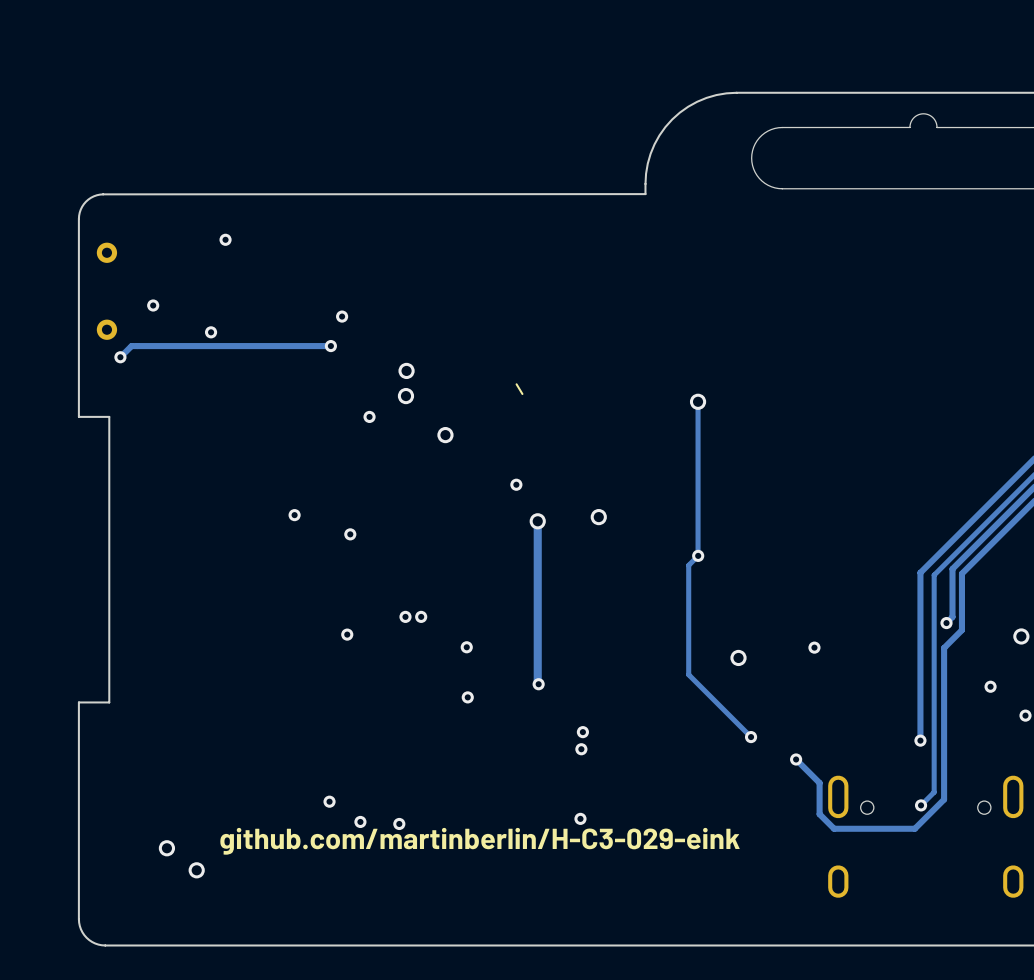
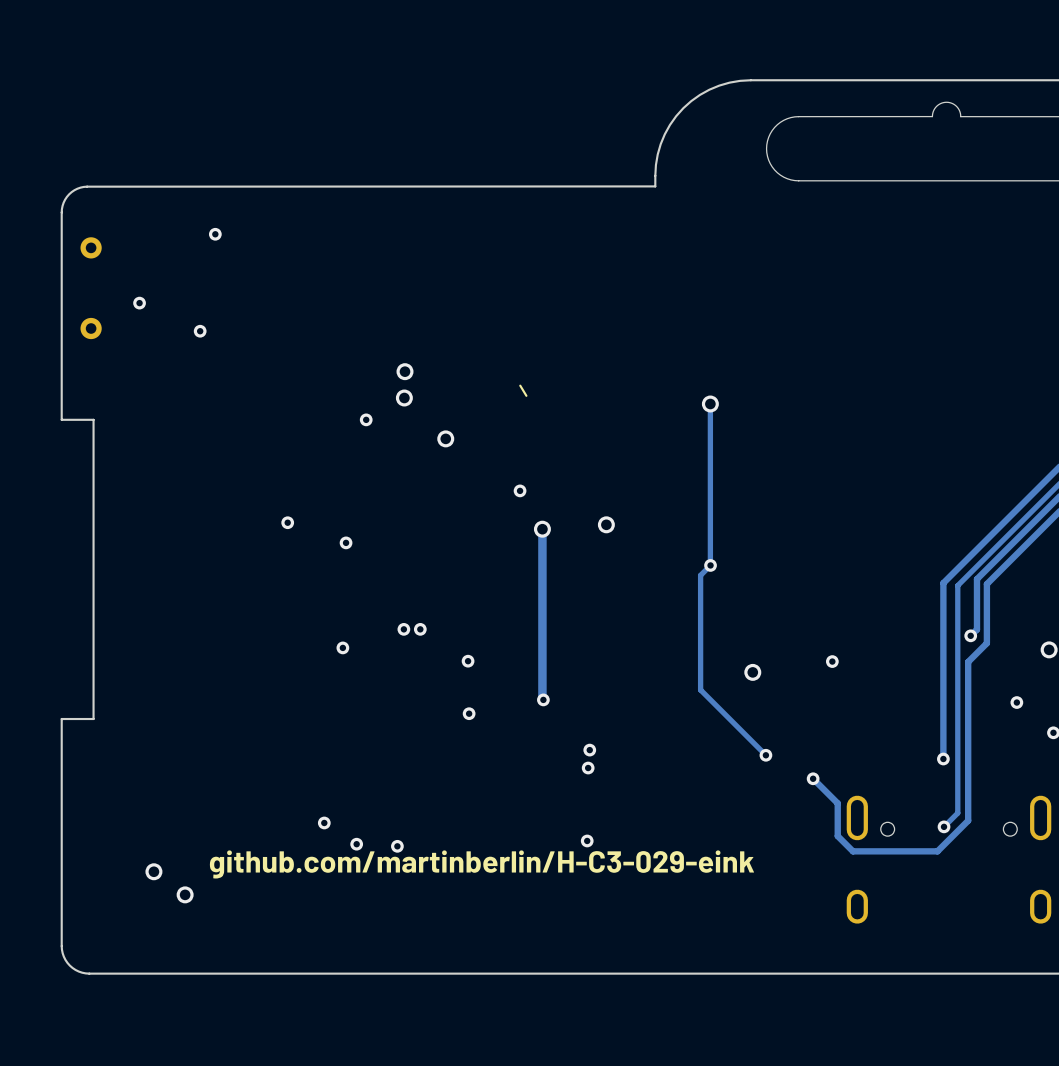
via: (342, 316) -> none
track: (330, 346) (131, 346) (120, 357) -> none
via: (330, 346) -> none
via: (120, 357) -> none

